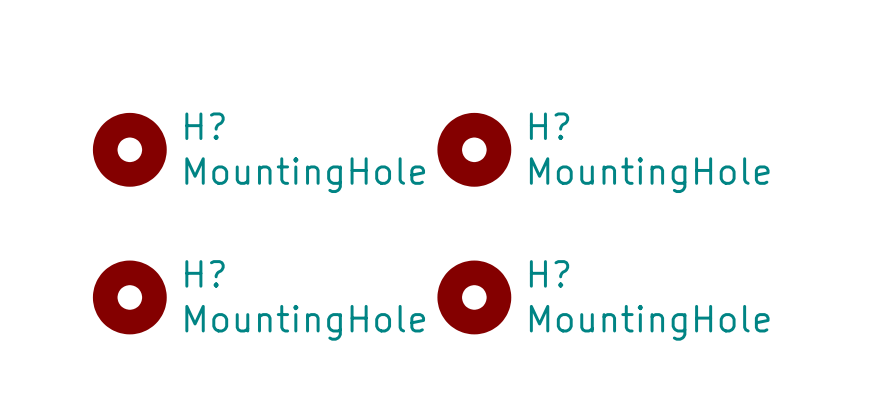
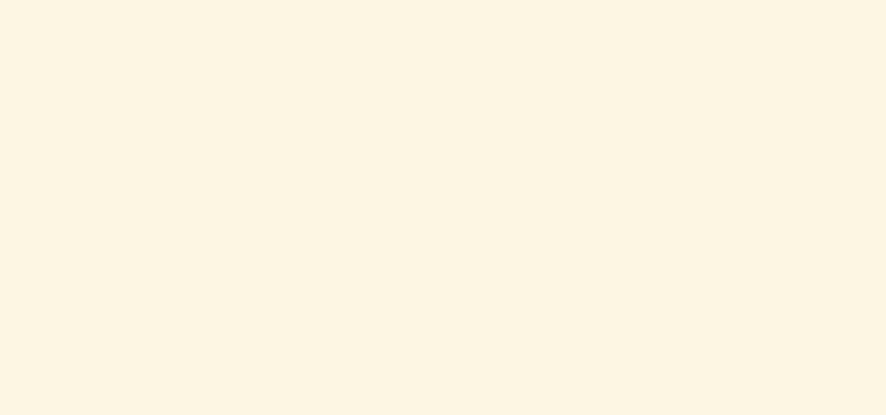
H?: MountingHole (129, 149) -> none
H?: MountingHole (474, 149) -> none
H?: MountingHole (129, 297) -> none
H?: MountingHole (474, 297) -> none

